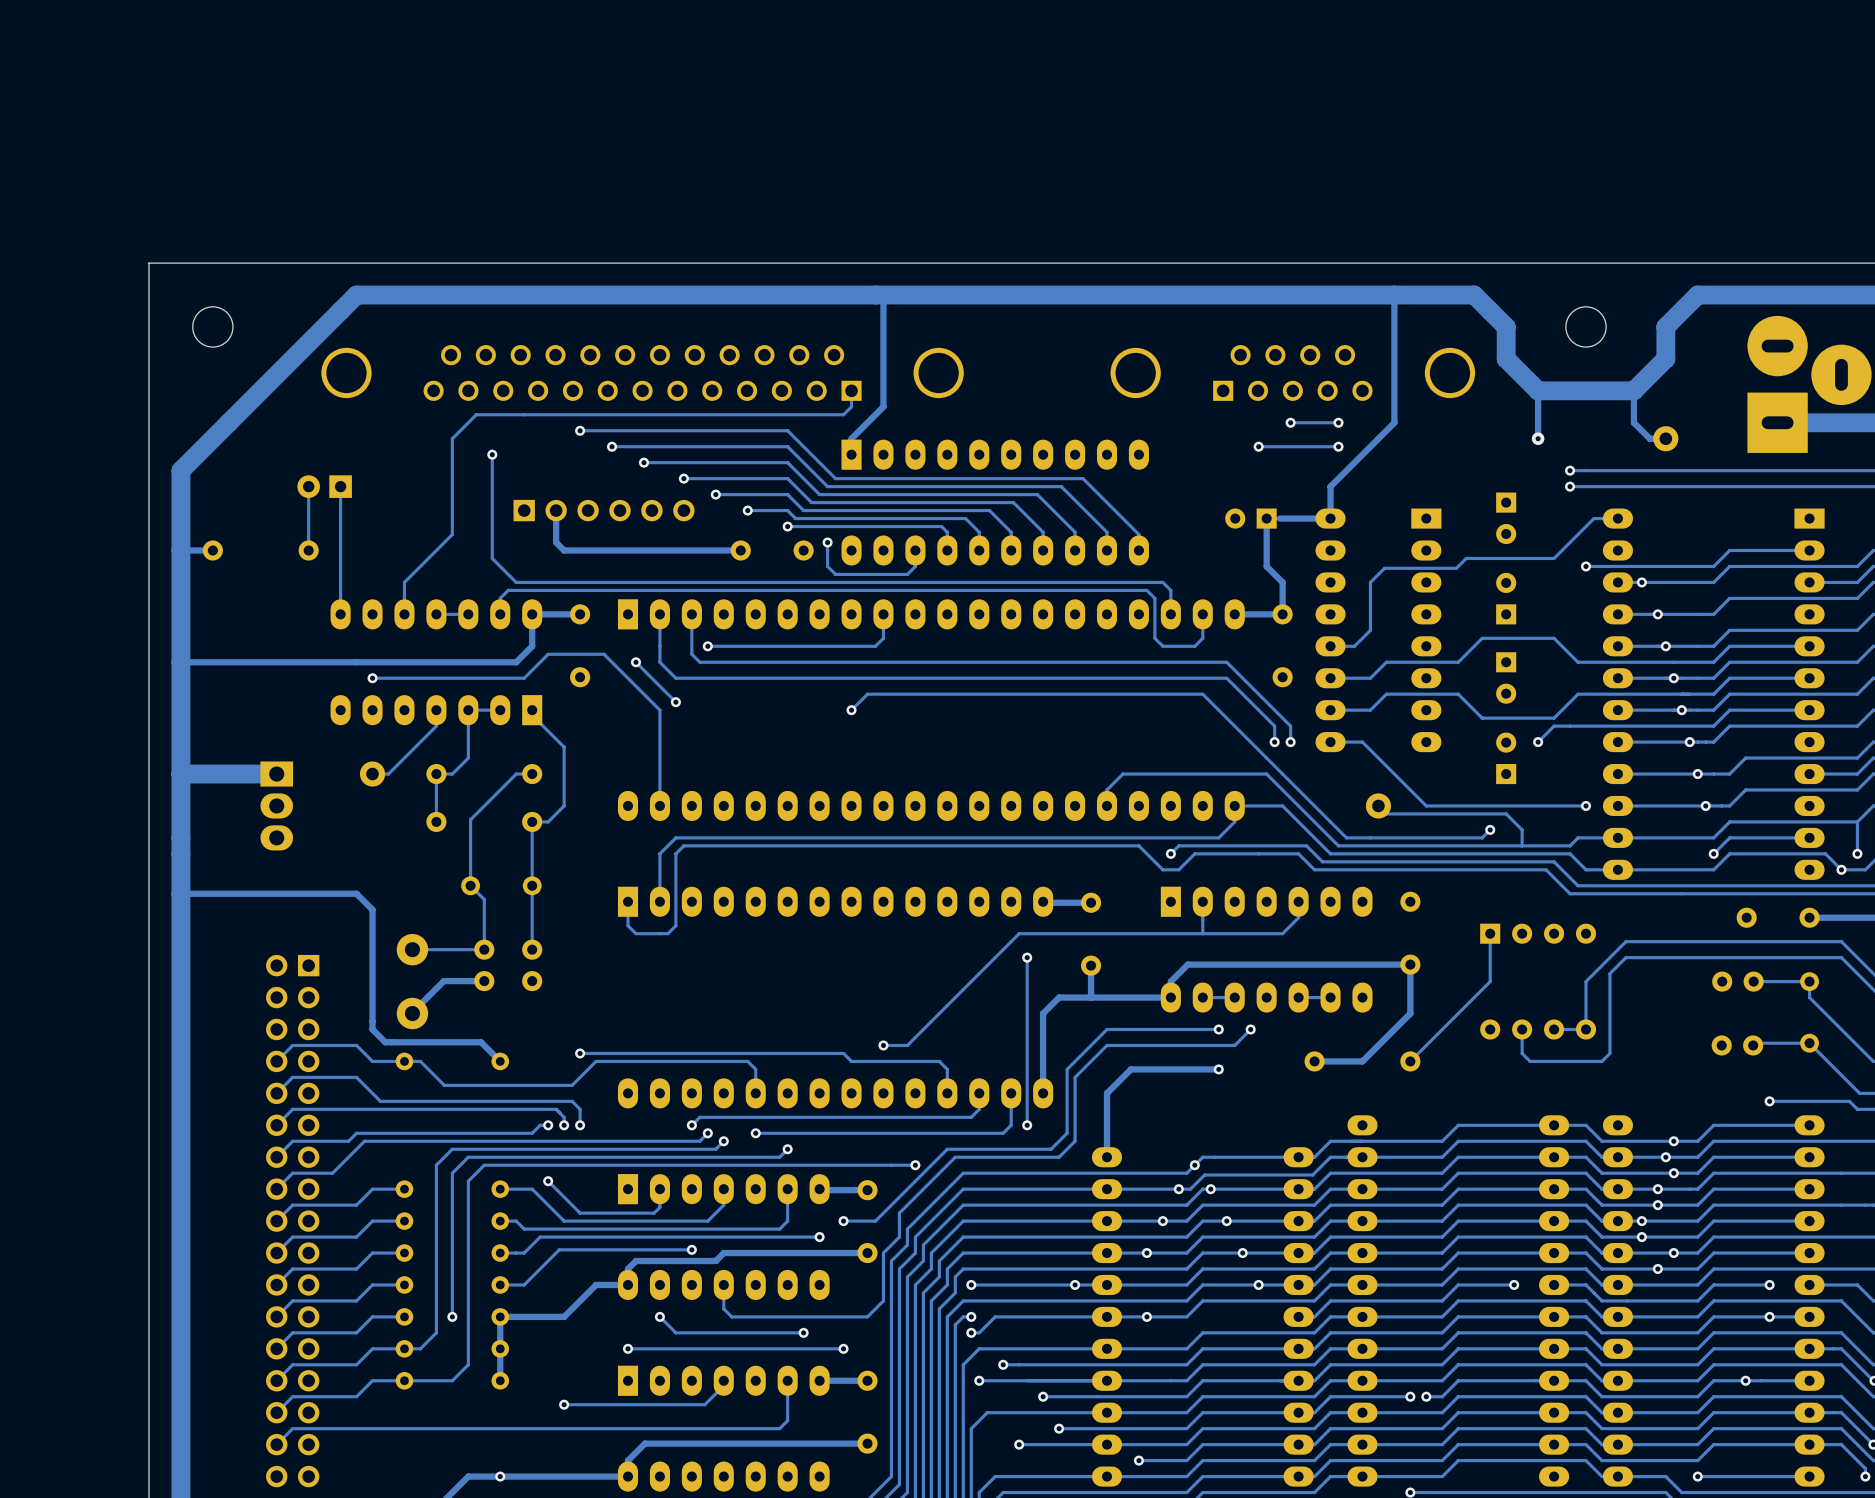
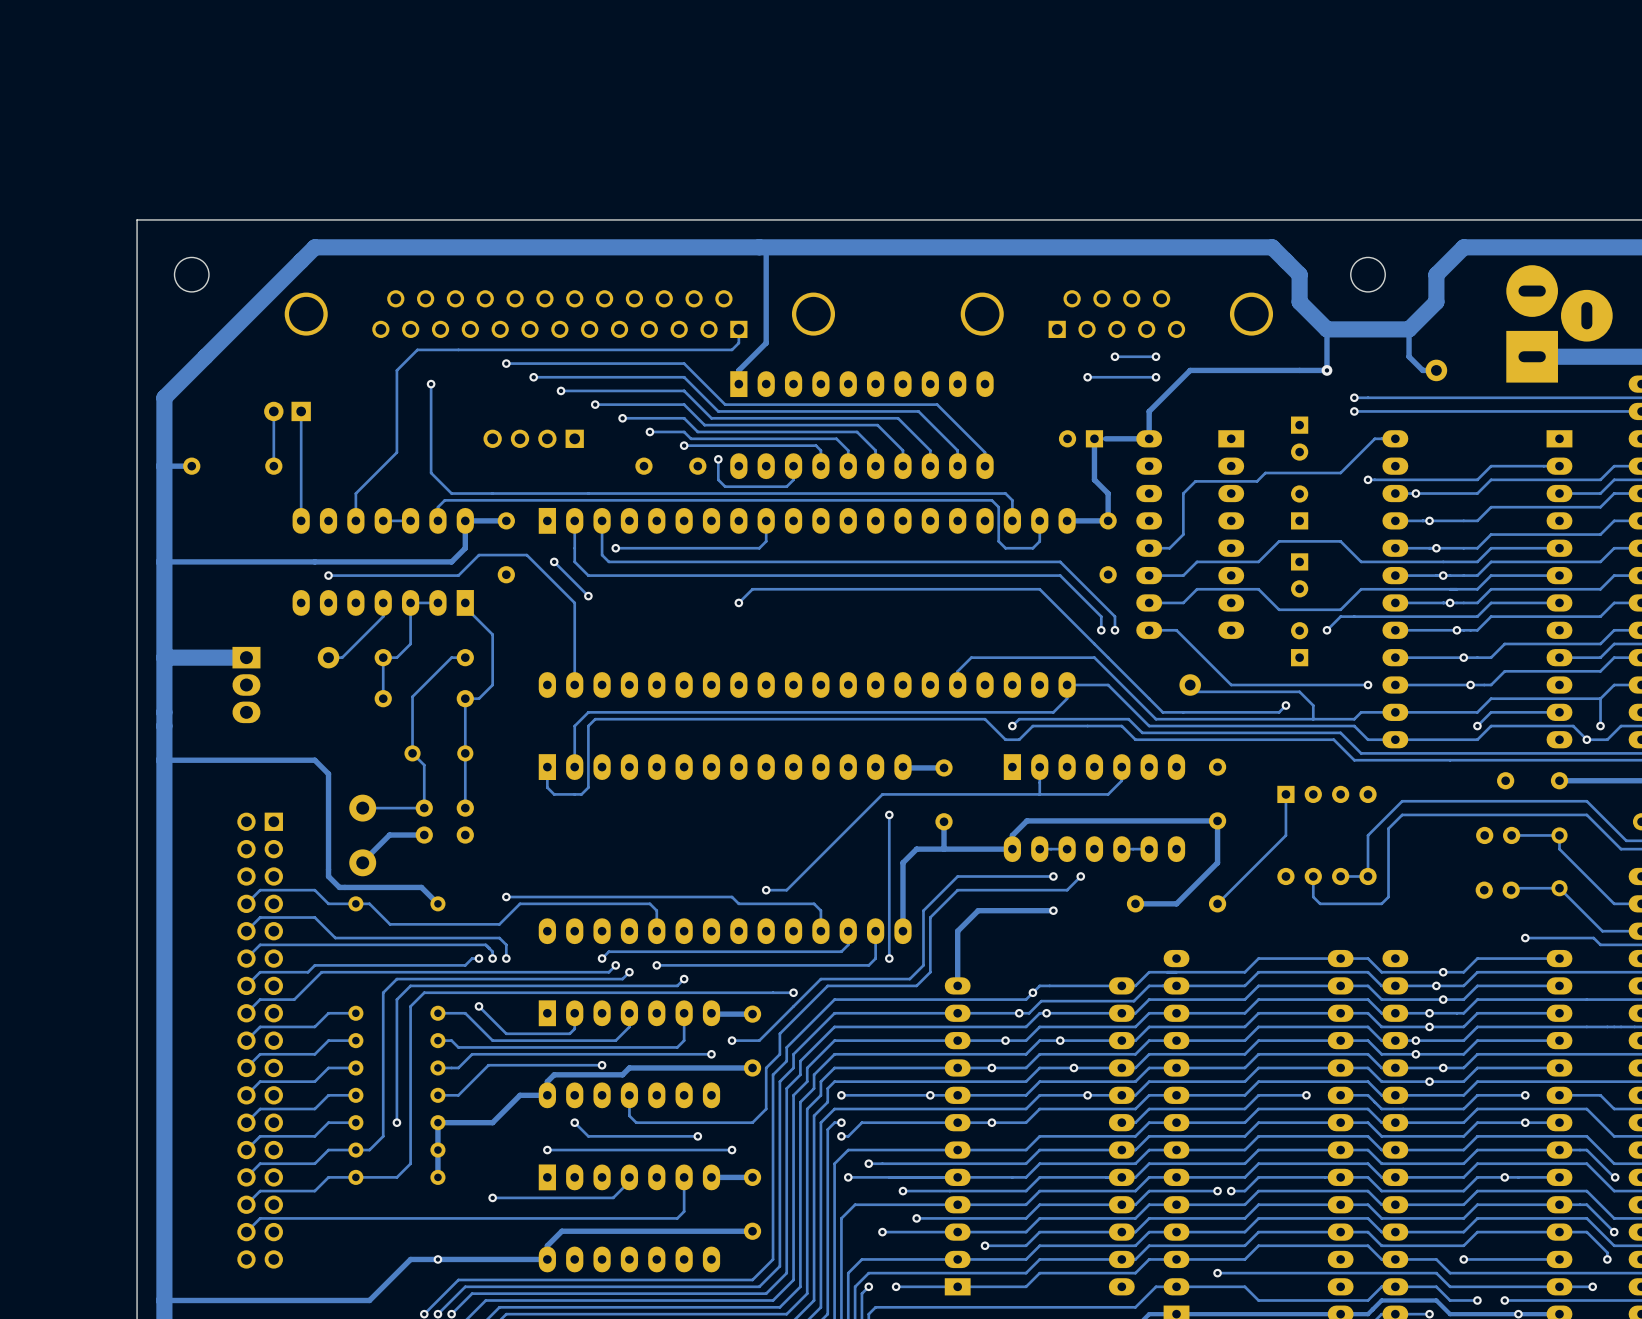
track: (1394, 295) (1394, 422) (1378, 438) -> (1326, 370) (1190, 370)
part footprint: [513, 499, 695, 522] -> [483, 429, 584, 448]
track: (556, 510) (556, 542) (564, 550) (740, 550) -> none

